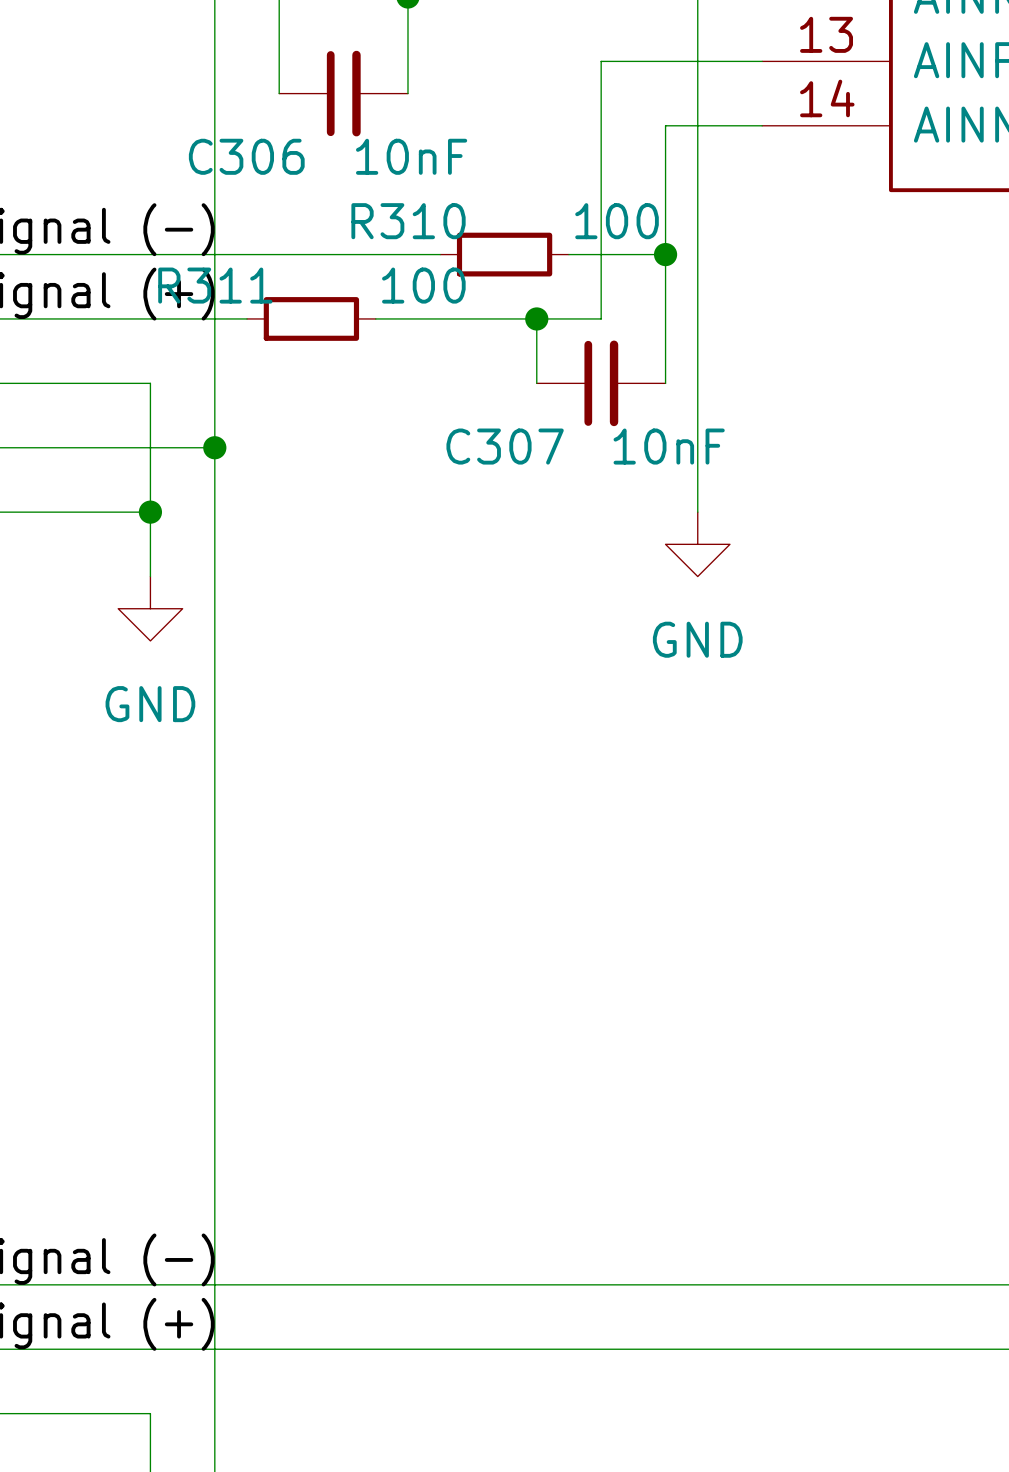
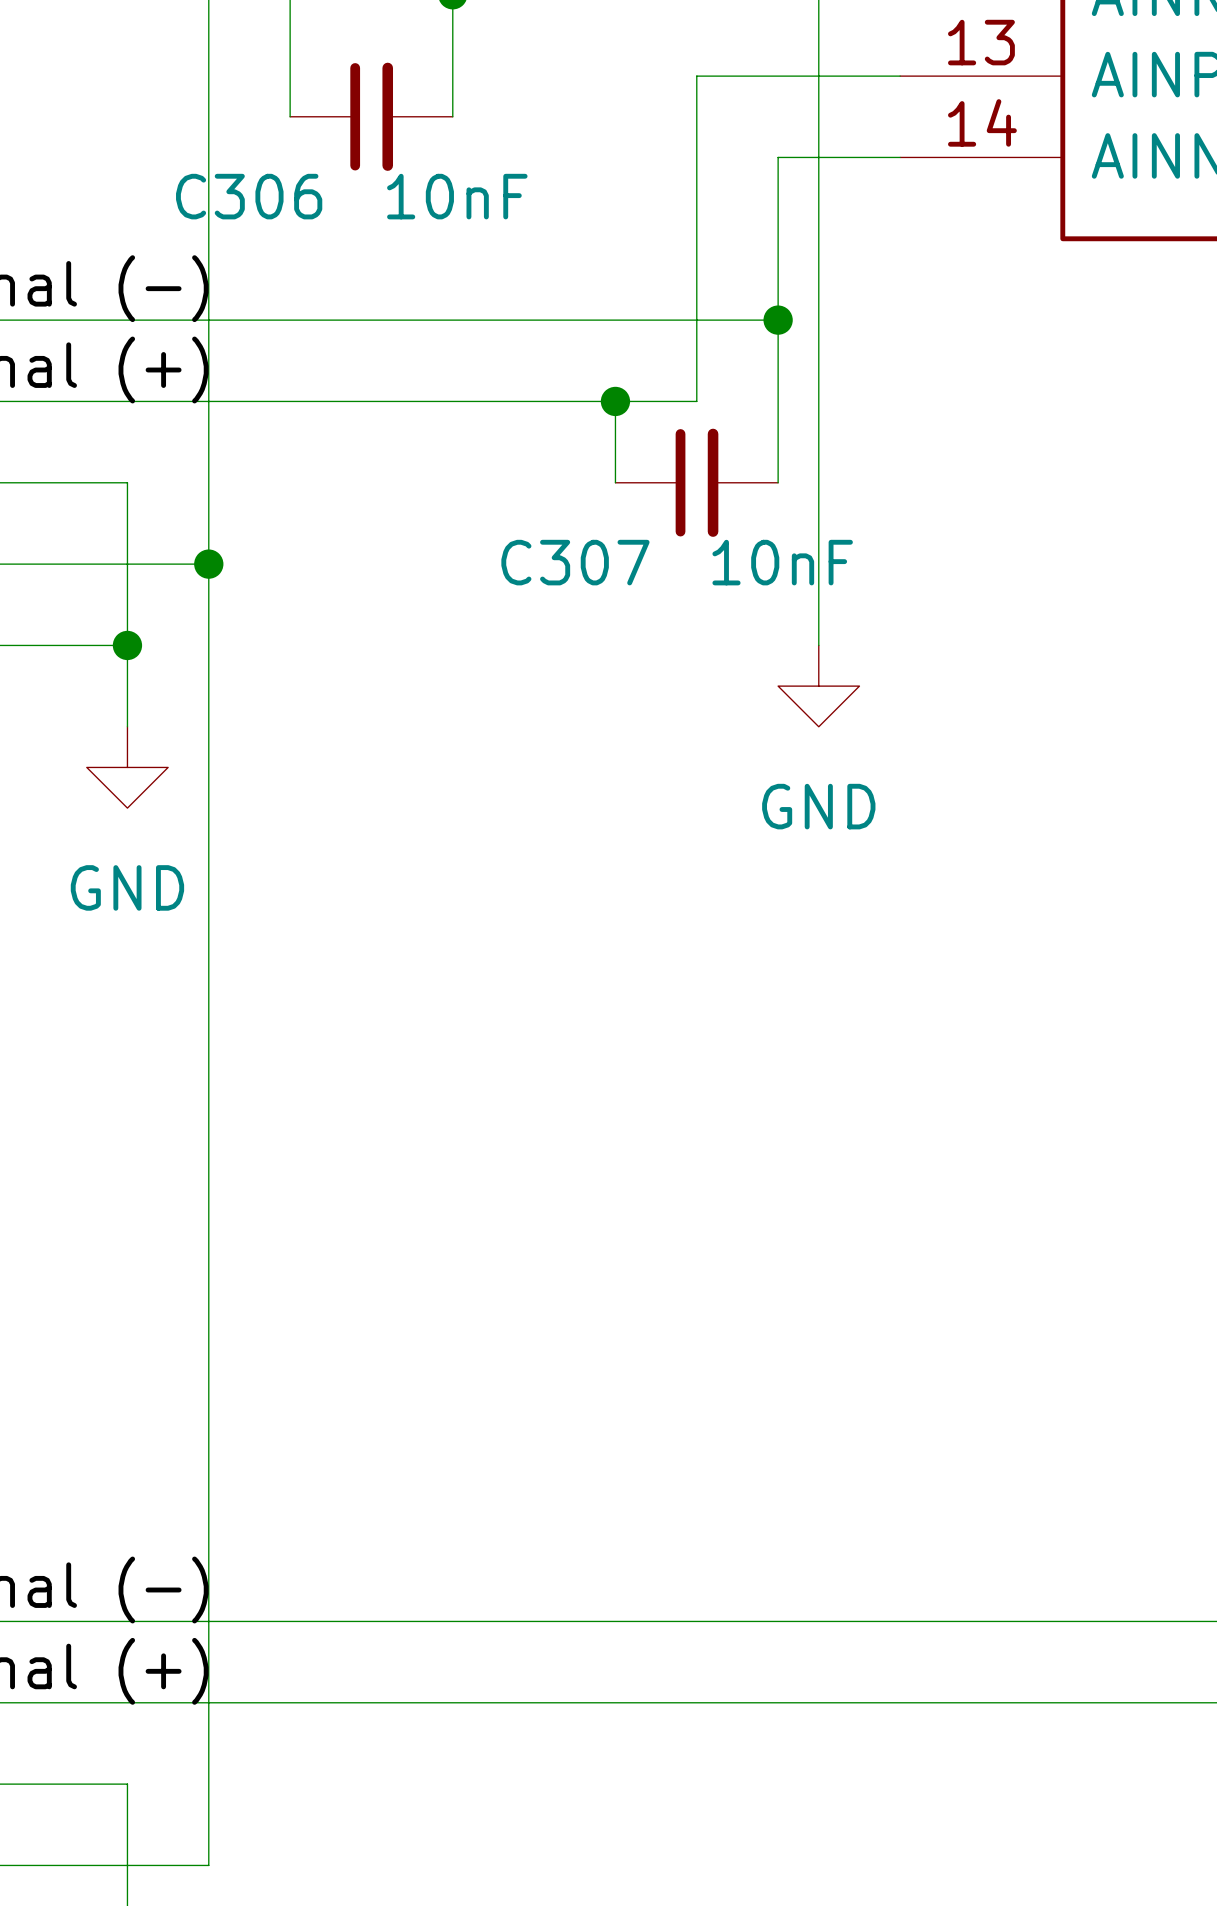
wire: none -> (493, 320) (656, 320)
R310: 100 (504, 254) -> none
wire: none -> (249, 401) (412, 401)
R311: 100 (311, 318) -> none

